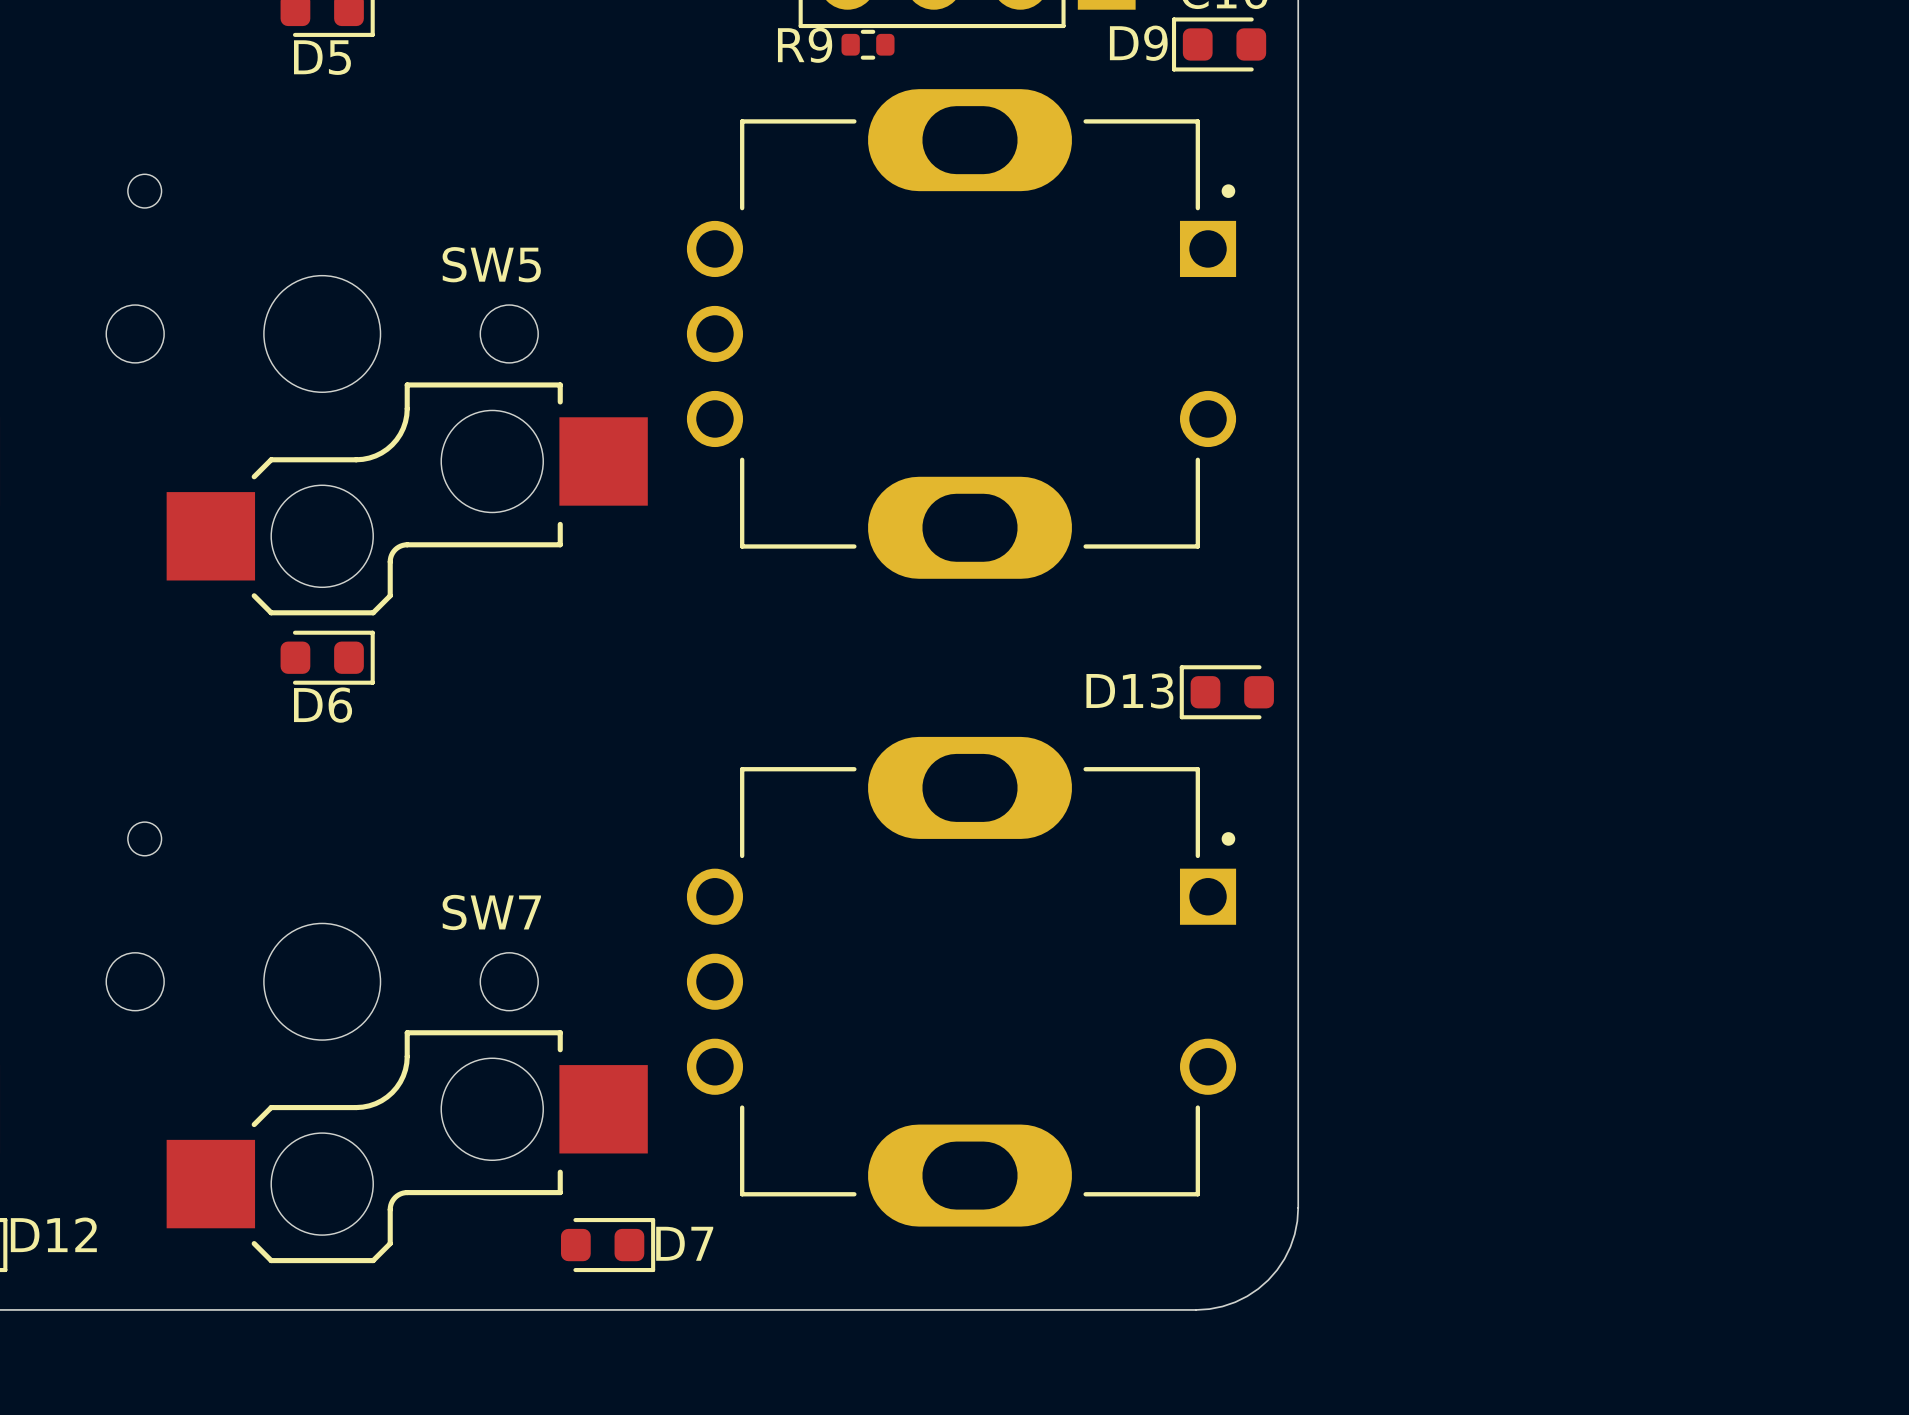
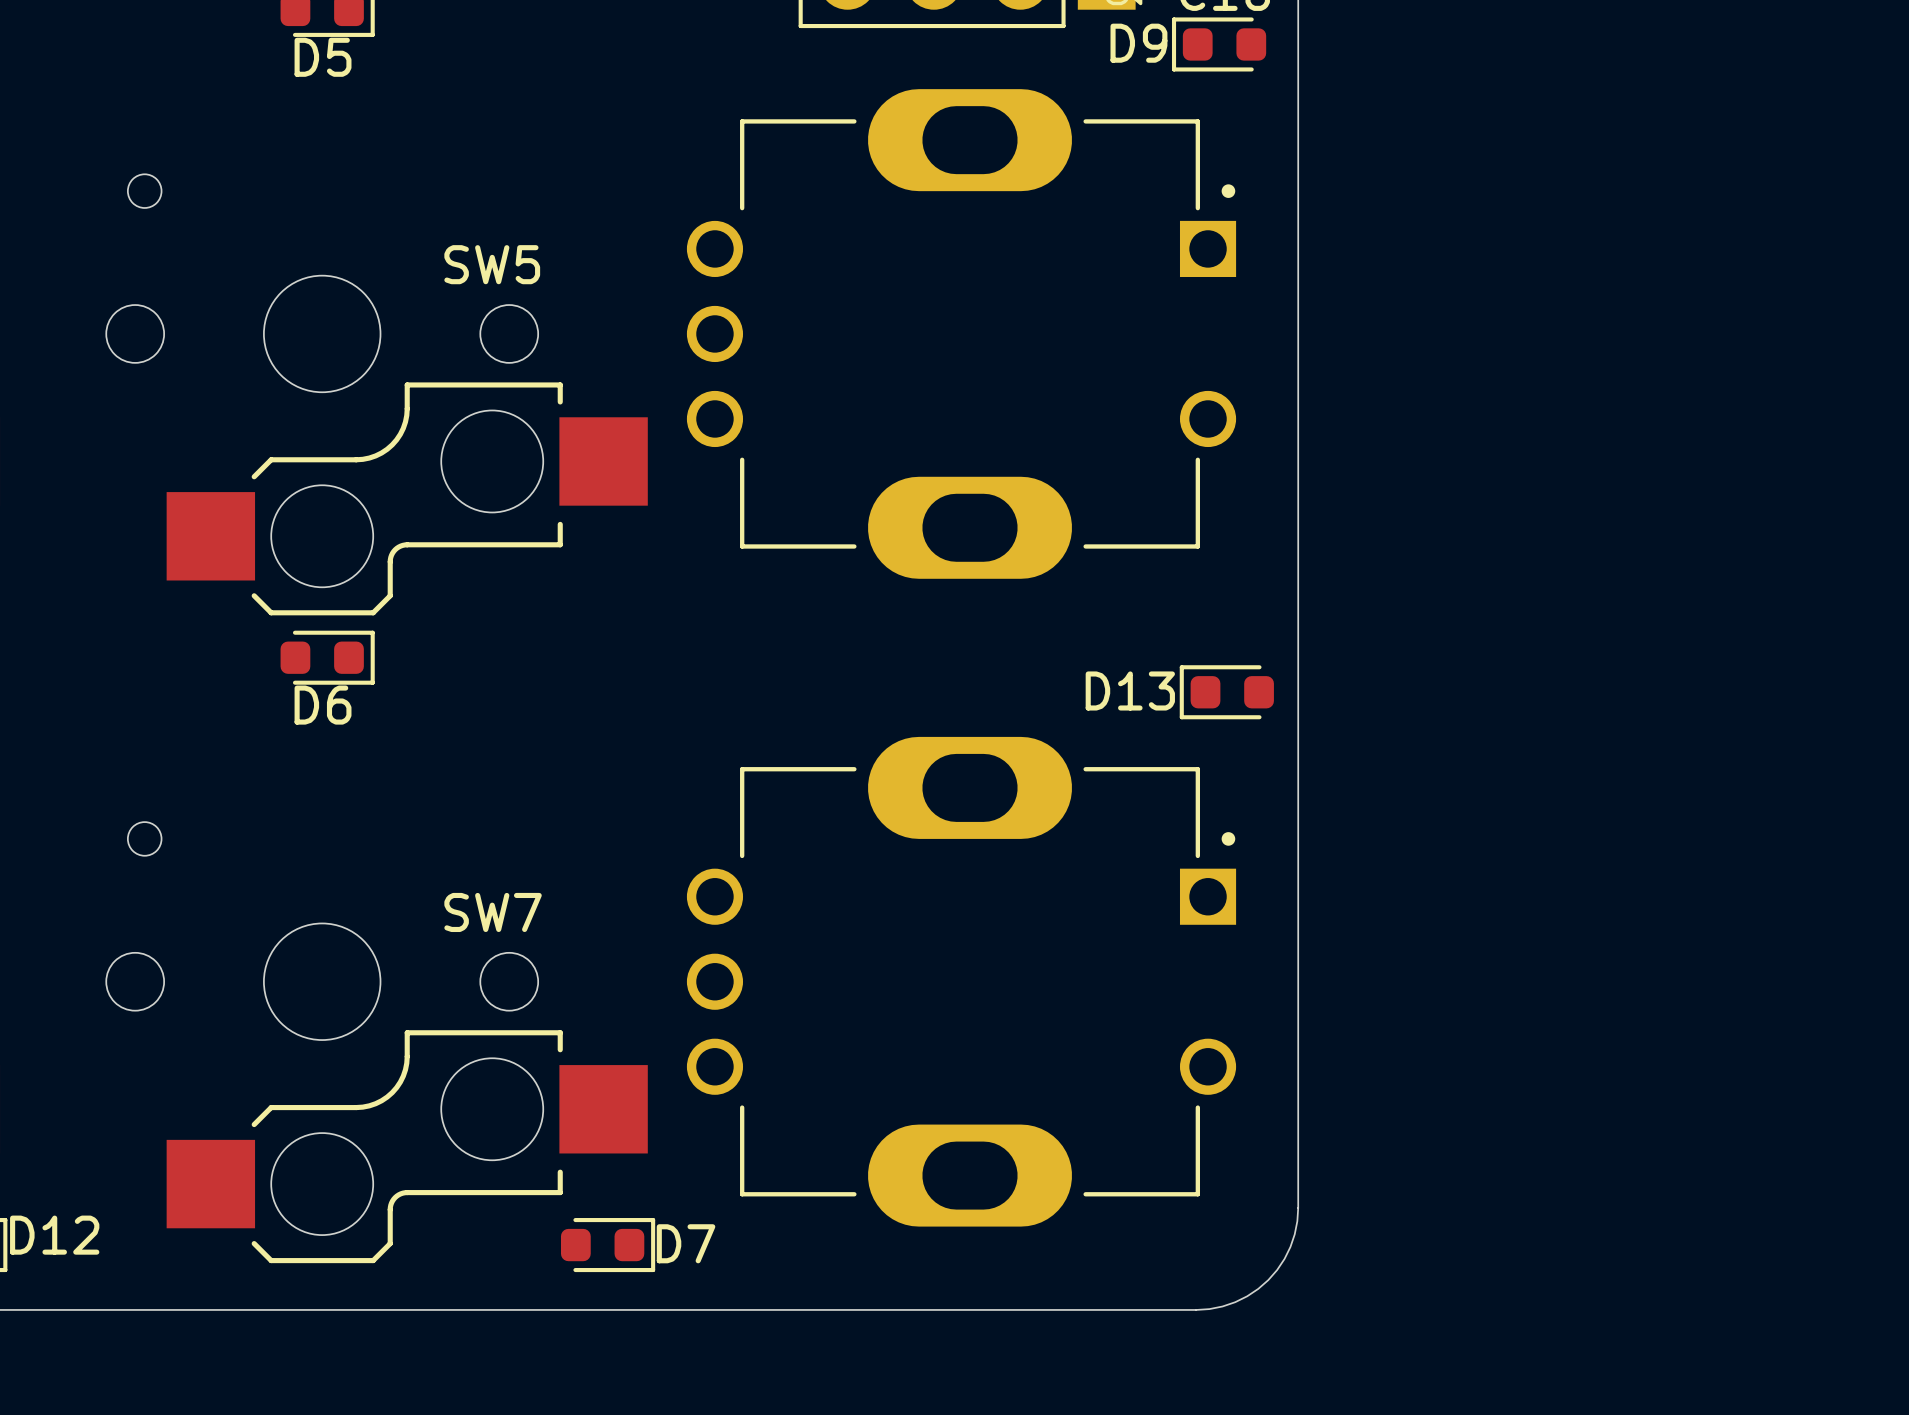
R9: (868, 44) -> none

